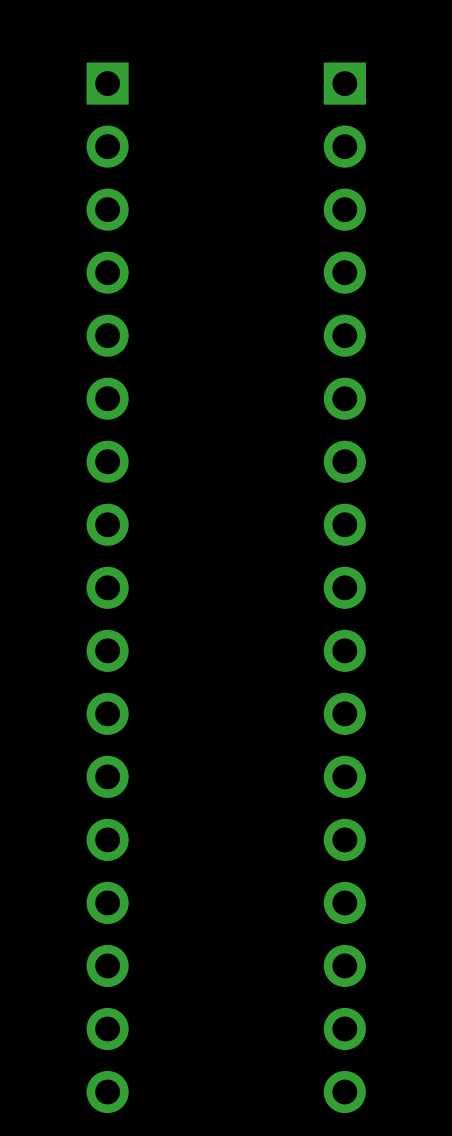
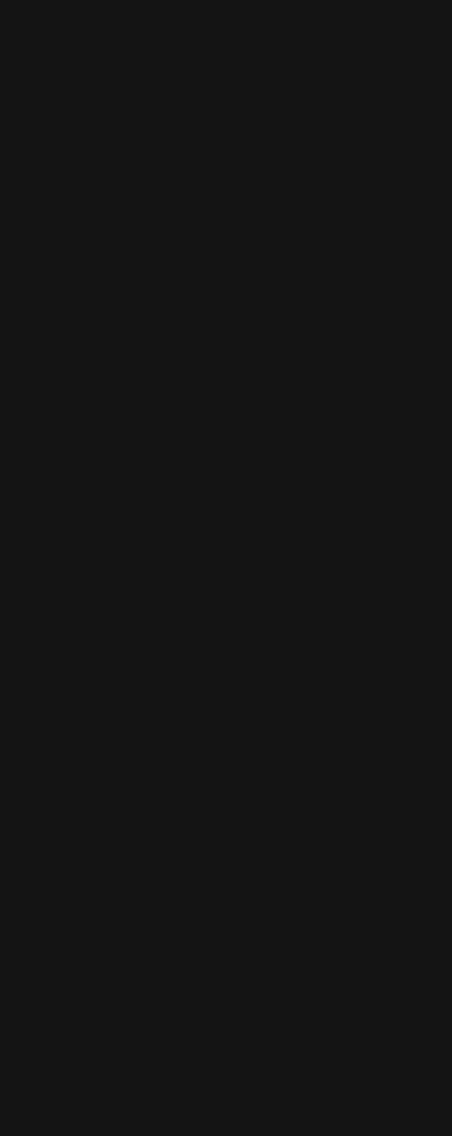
part: (107, 587) -> none
part: (344, 587) -> none

